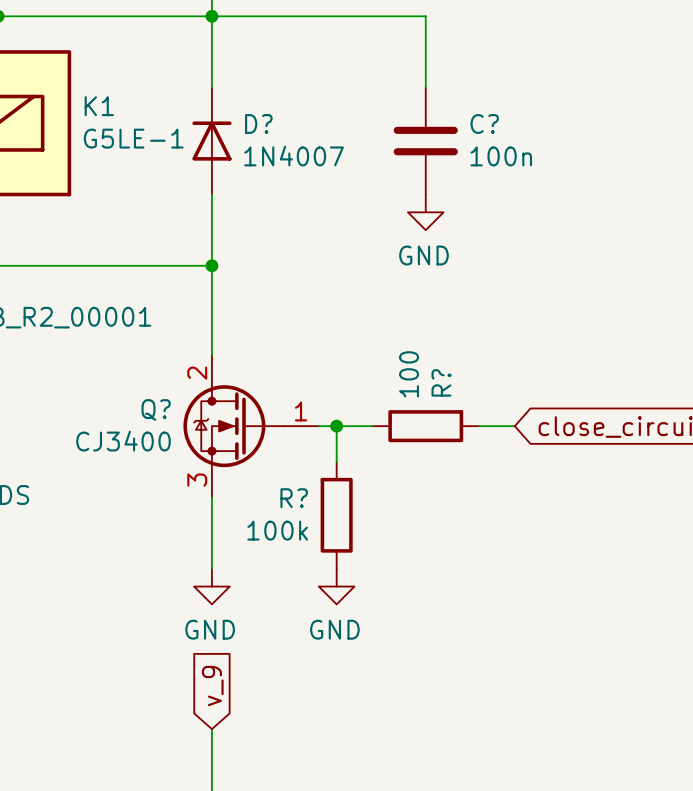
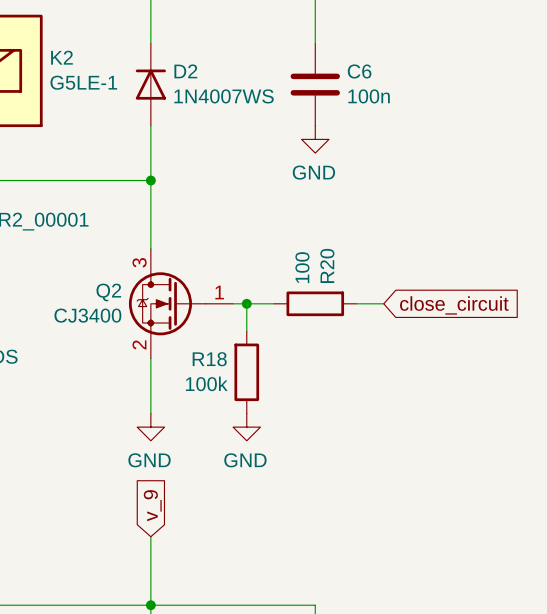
K1 name: K1 (99, 106) -> K2 (61, 57)
D? name: D? (258, 123) -> D2 (185, 71)
C? name: C? (484, 123) -> C6 (359, 71)
D? value: 1N4007 (294, 156) -> 1N4007WS (224, 96)
Q? pin number: 2 (197, 373) -> 3 (139, 262)
R? name: R? (441, 382) -> R20 (327, 265)
Q? name: Q? (156, 409) -> Q2 (108, 292)
Q? pin number: 3 (197, 480) -> 2 (139, 344)
R? name: R? (294, 498) -> R18 (209, 359)

